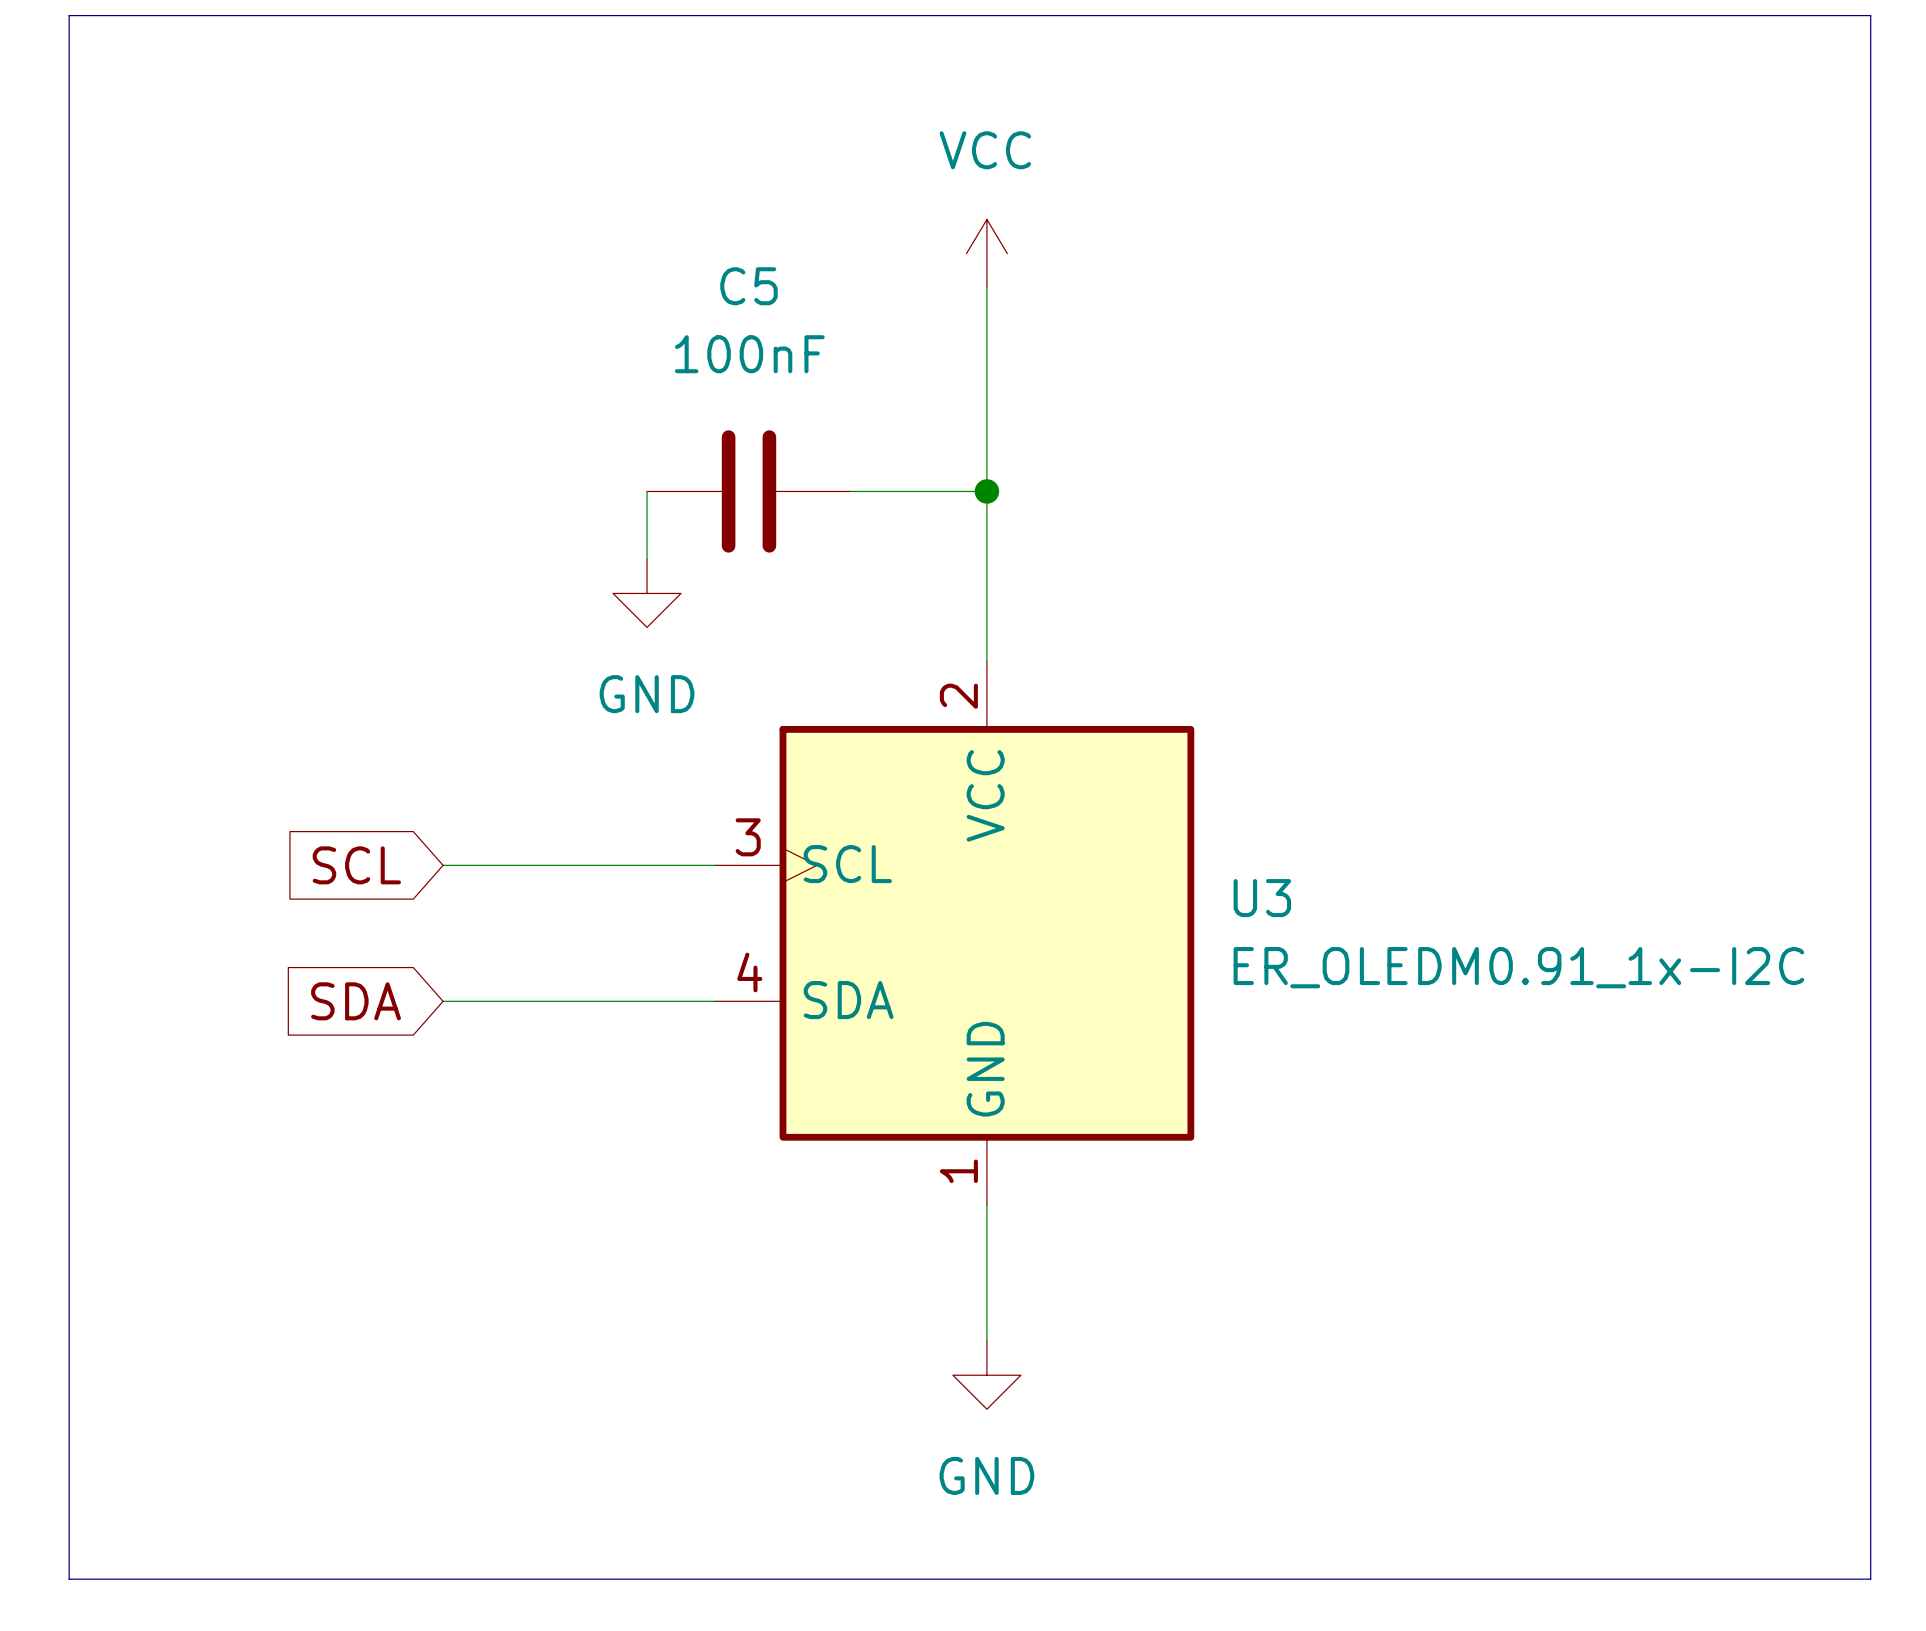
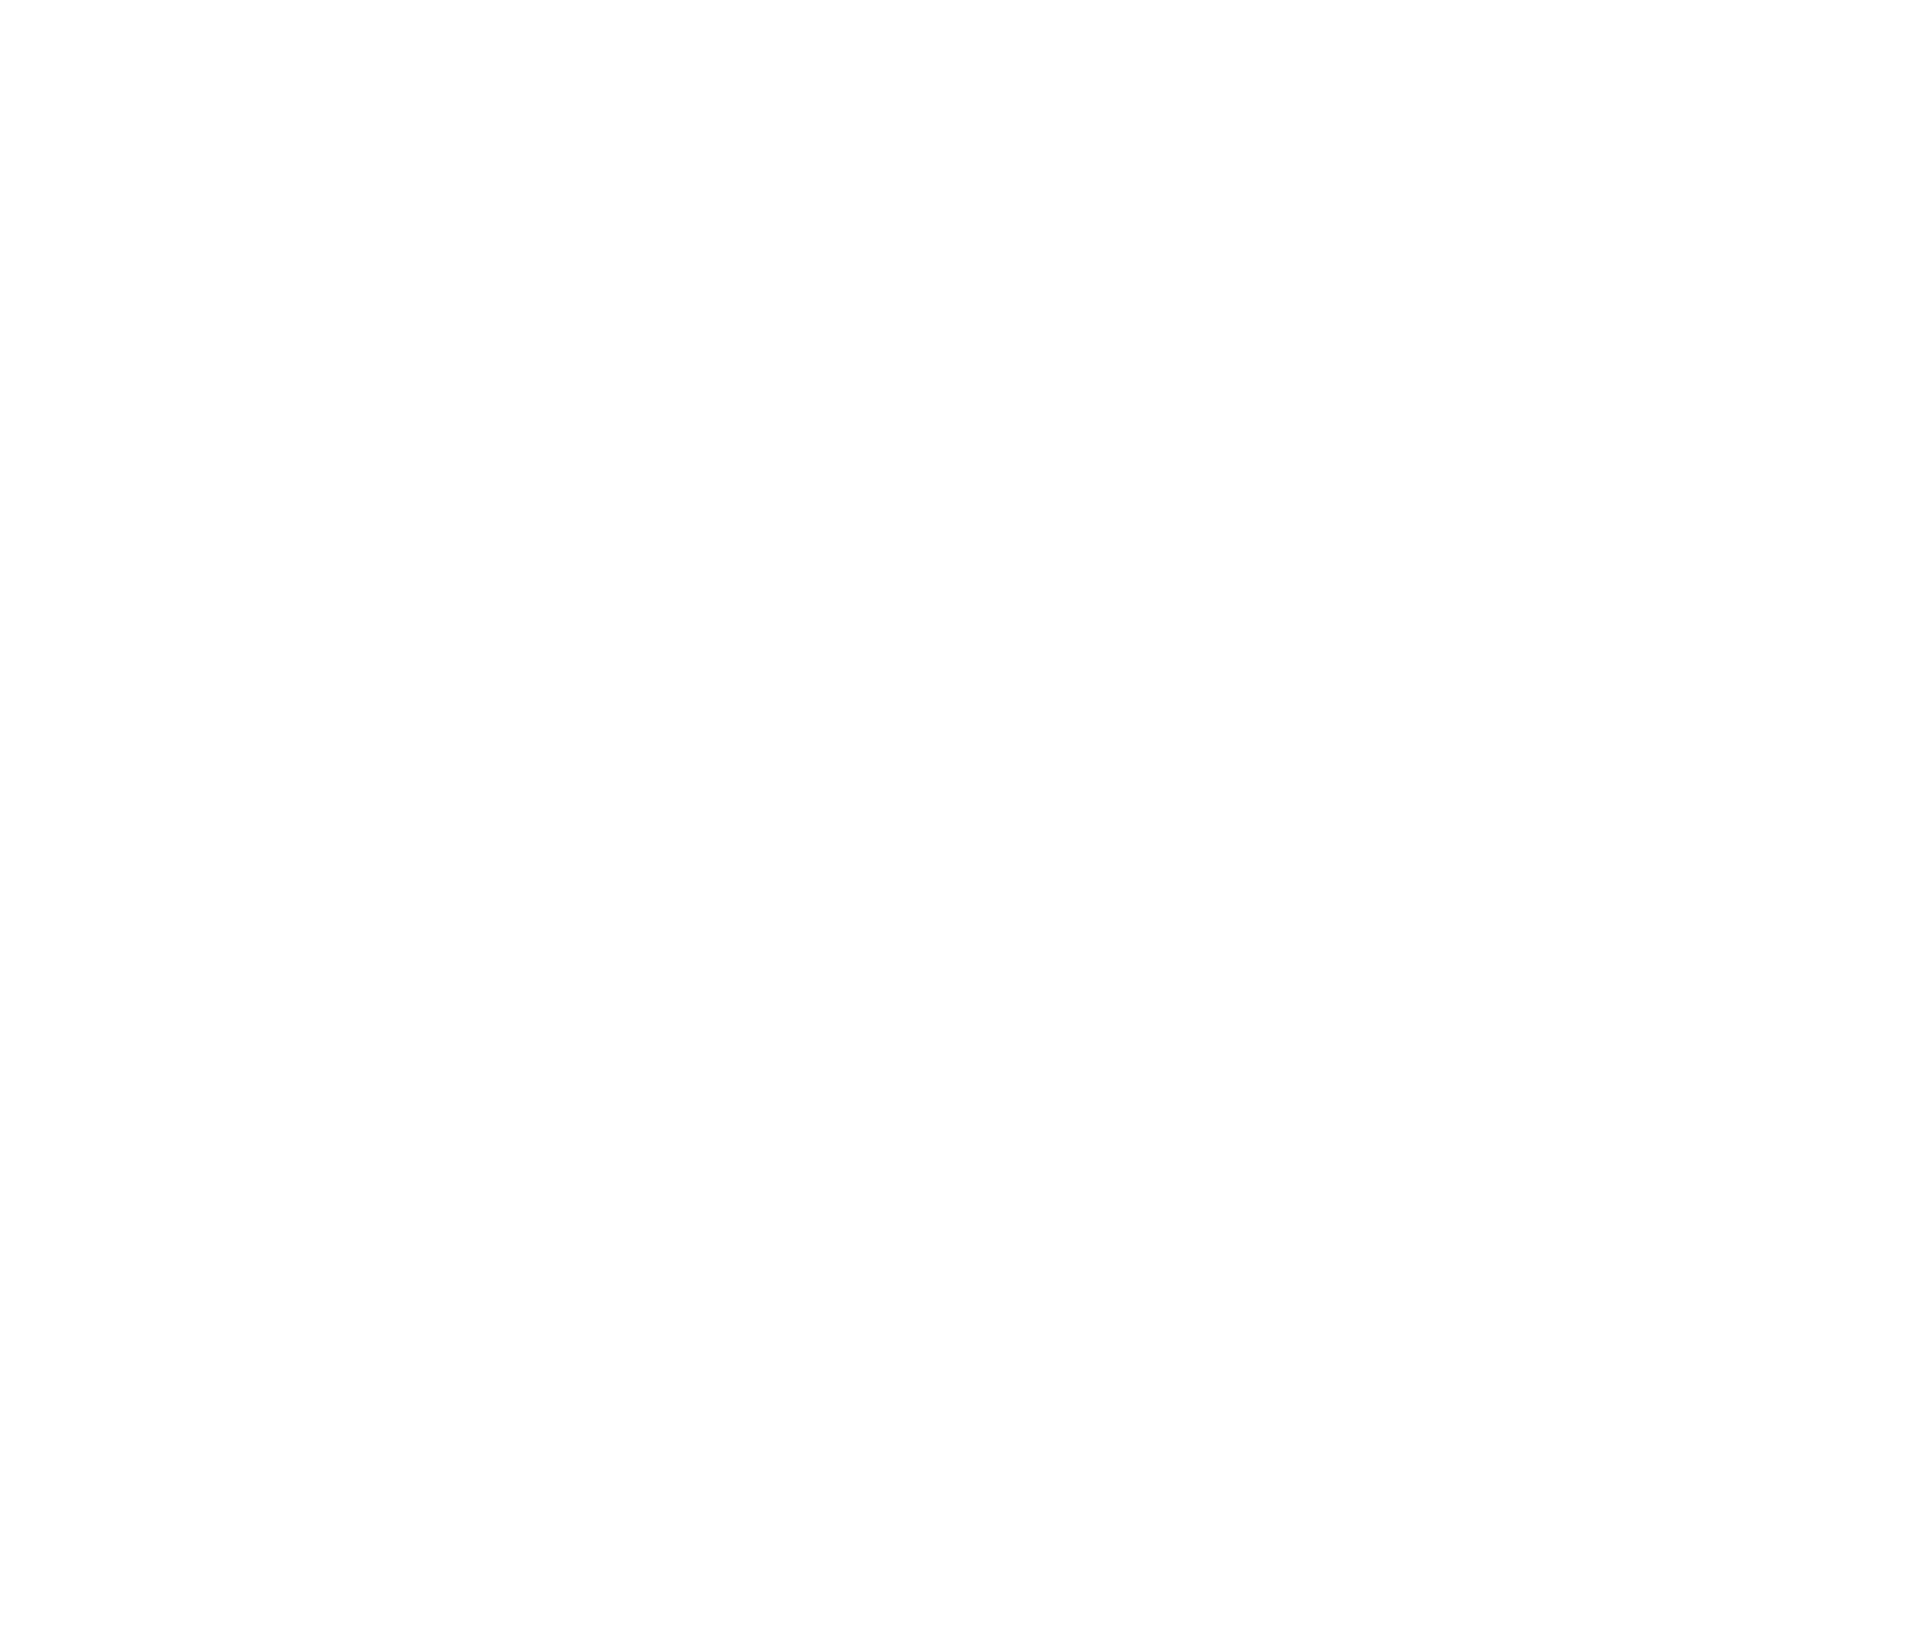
line: (69, 15) (1870, 15) (1870, 1579) (69, 1579) (69, 15) -> none
power symbol: VCC (986, 253) -> none
wire: (986, 287) (986, 661) -> none
wire: (647, 491) (647, 559) -> none
C5: 100nF (748, 491) -> none
wire: (850, 491) (986, 491) -> none
junction: (986, 491) -> none
power symbol: GND (647, 593) -> none
global label: SCL (356, 865) -> none
wire: (443, 865) (715, 865) -> none
U3: ER_OLEDM0.91_1x-I2C (954, 933) -> none
global label: SDA (356, 1001) -> none
wire: (443, 1001) (715, 1001) -> none
wire: (986, 1205) (986, 1341) -> none
power symbol: GND (986, 1375) -> none

